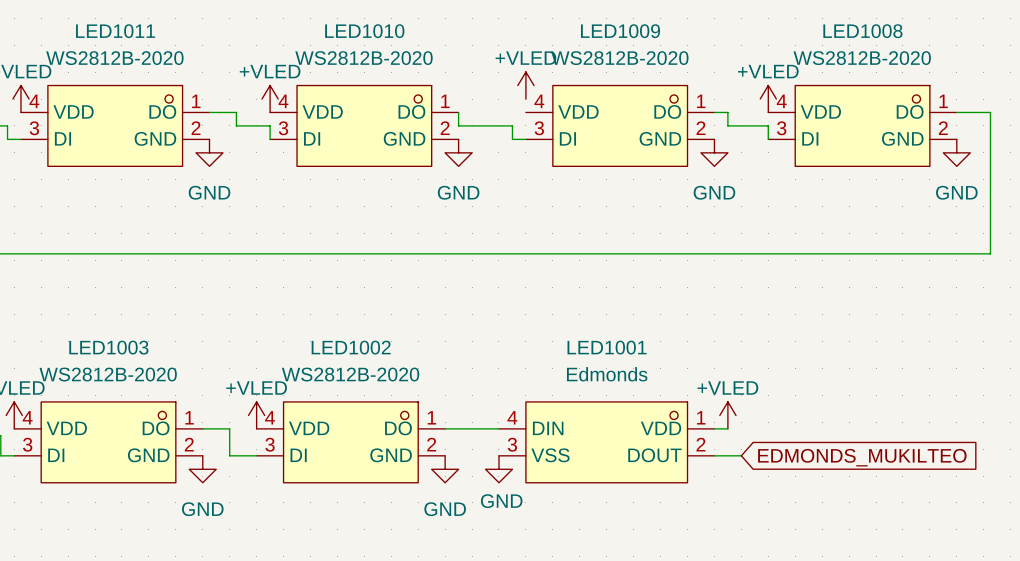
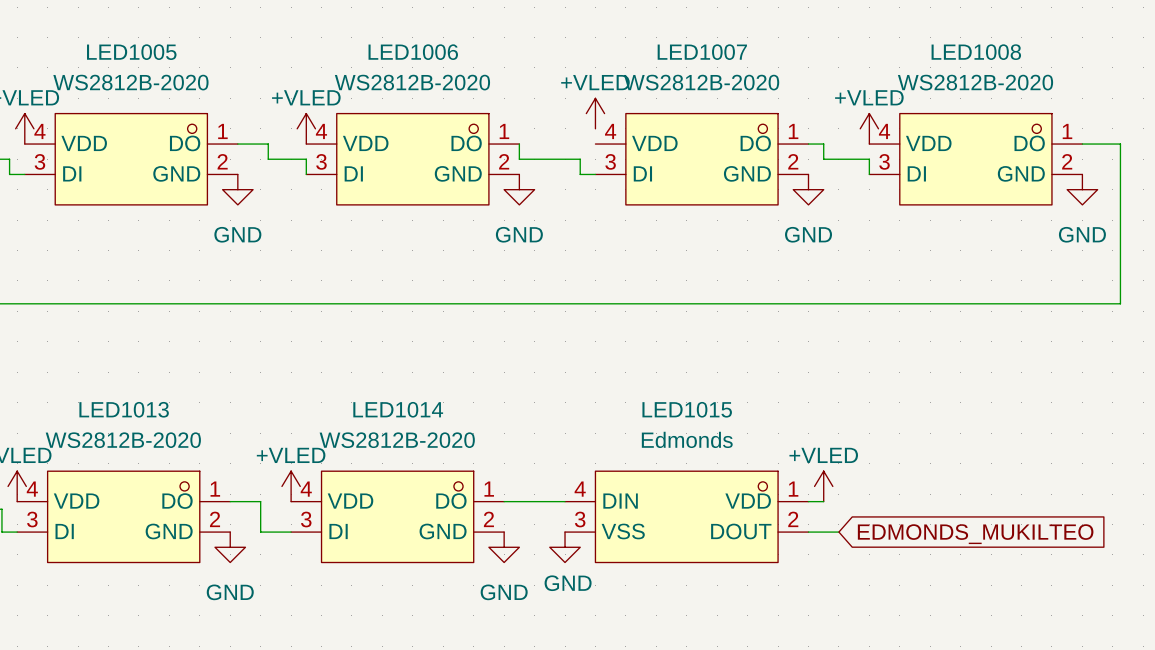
LED1011 name: LED1011 (115, 31) -> LED1005 (131, 52)
LED1010 name: LED1010 (364, 31) -> LED1006 (413, 52)
LED1009 name: LED1009 (620, 31) -> LED1007 (702, 52)
LED1003 name: LED1003 (108, 347) -> LED1013 (124, 409)
LED1002 name: LED1002 (351, 347) -> LED1014 (398, 409)
LED1001 name: LED1001 (607, 347) -> LED1015 (687, 409)

